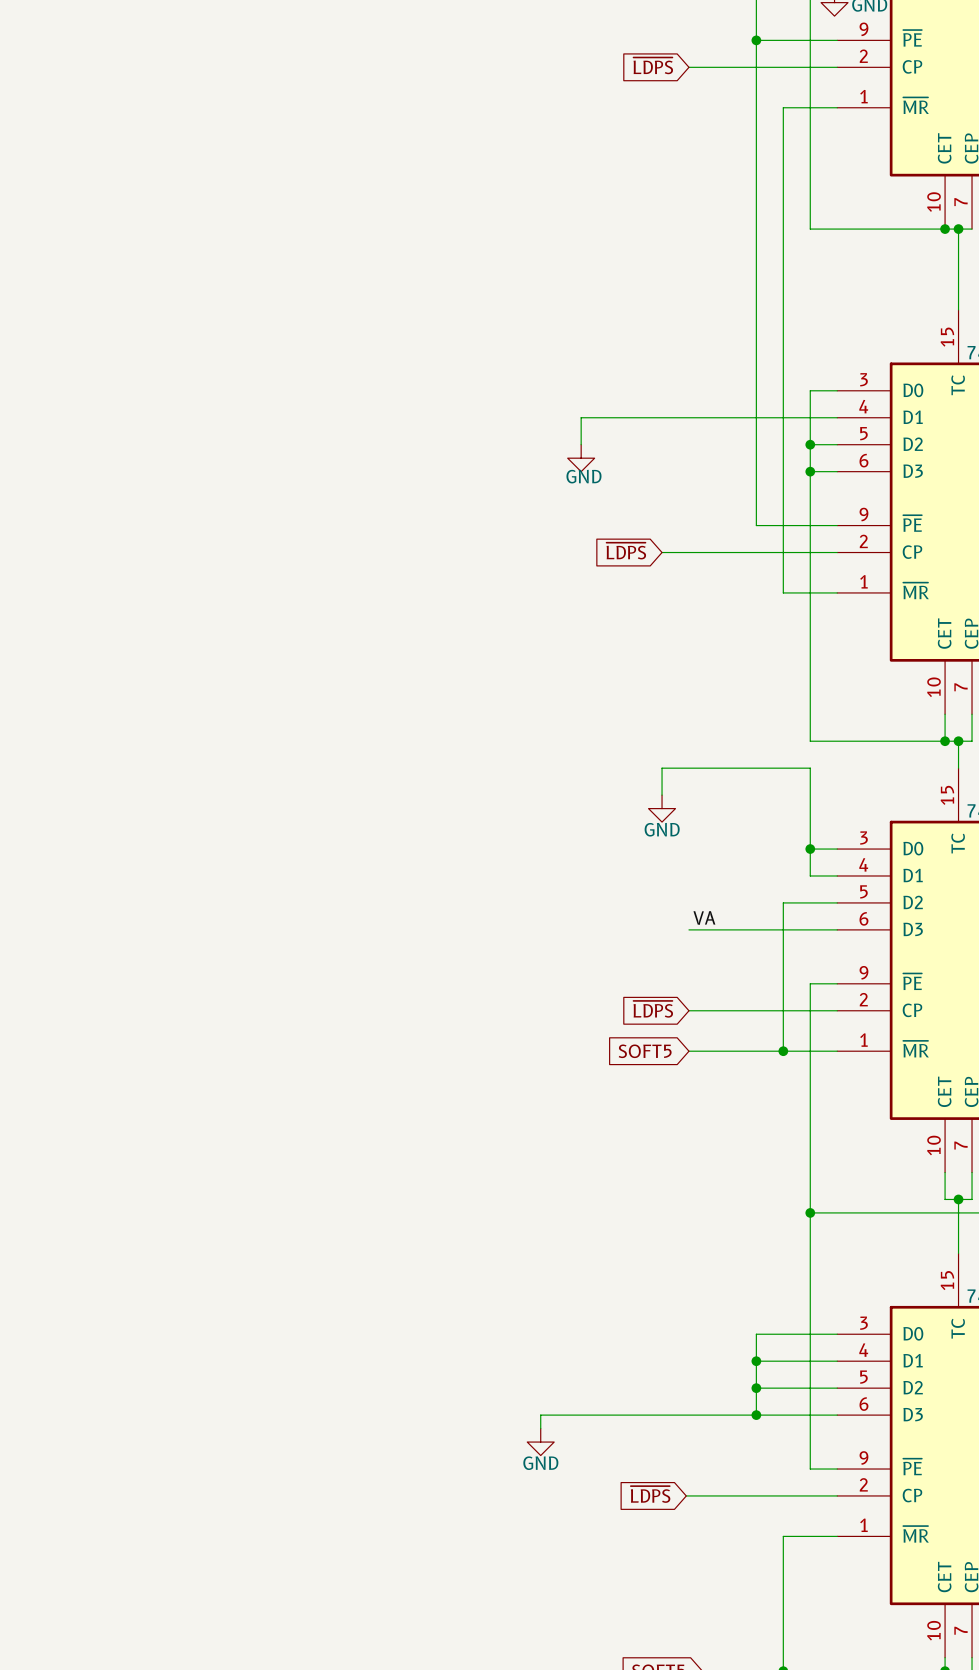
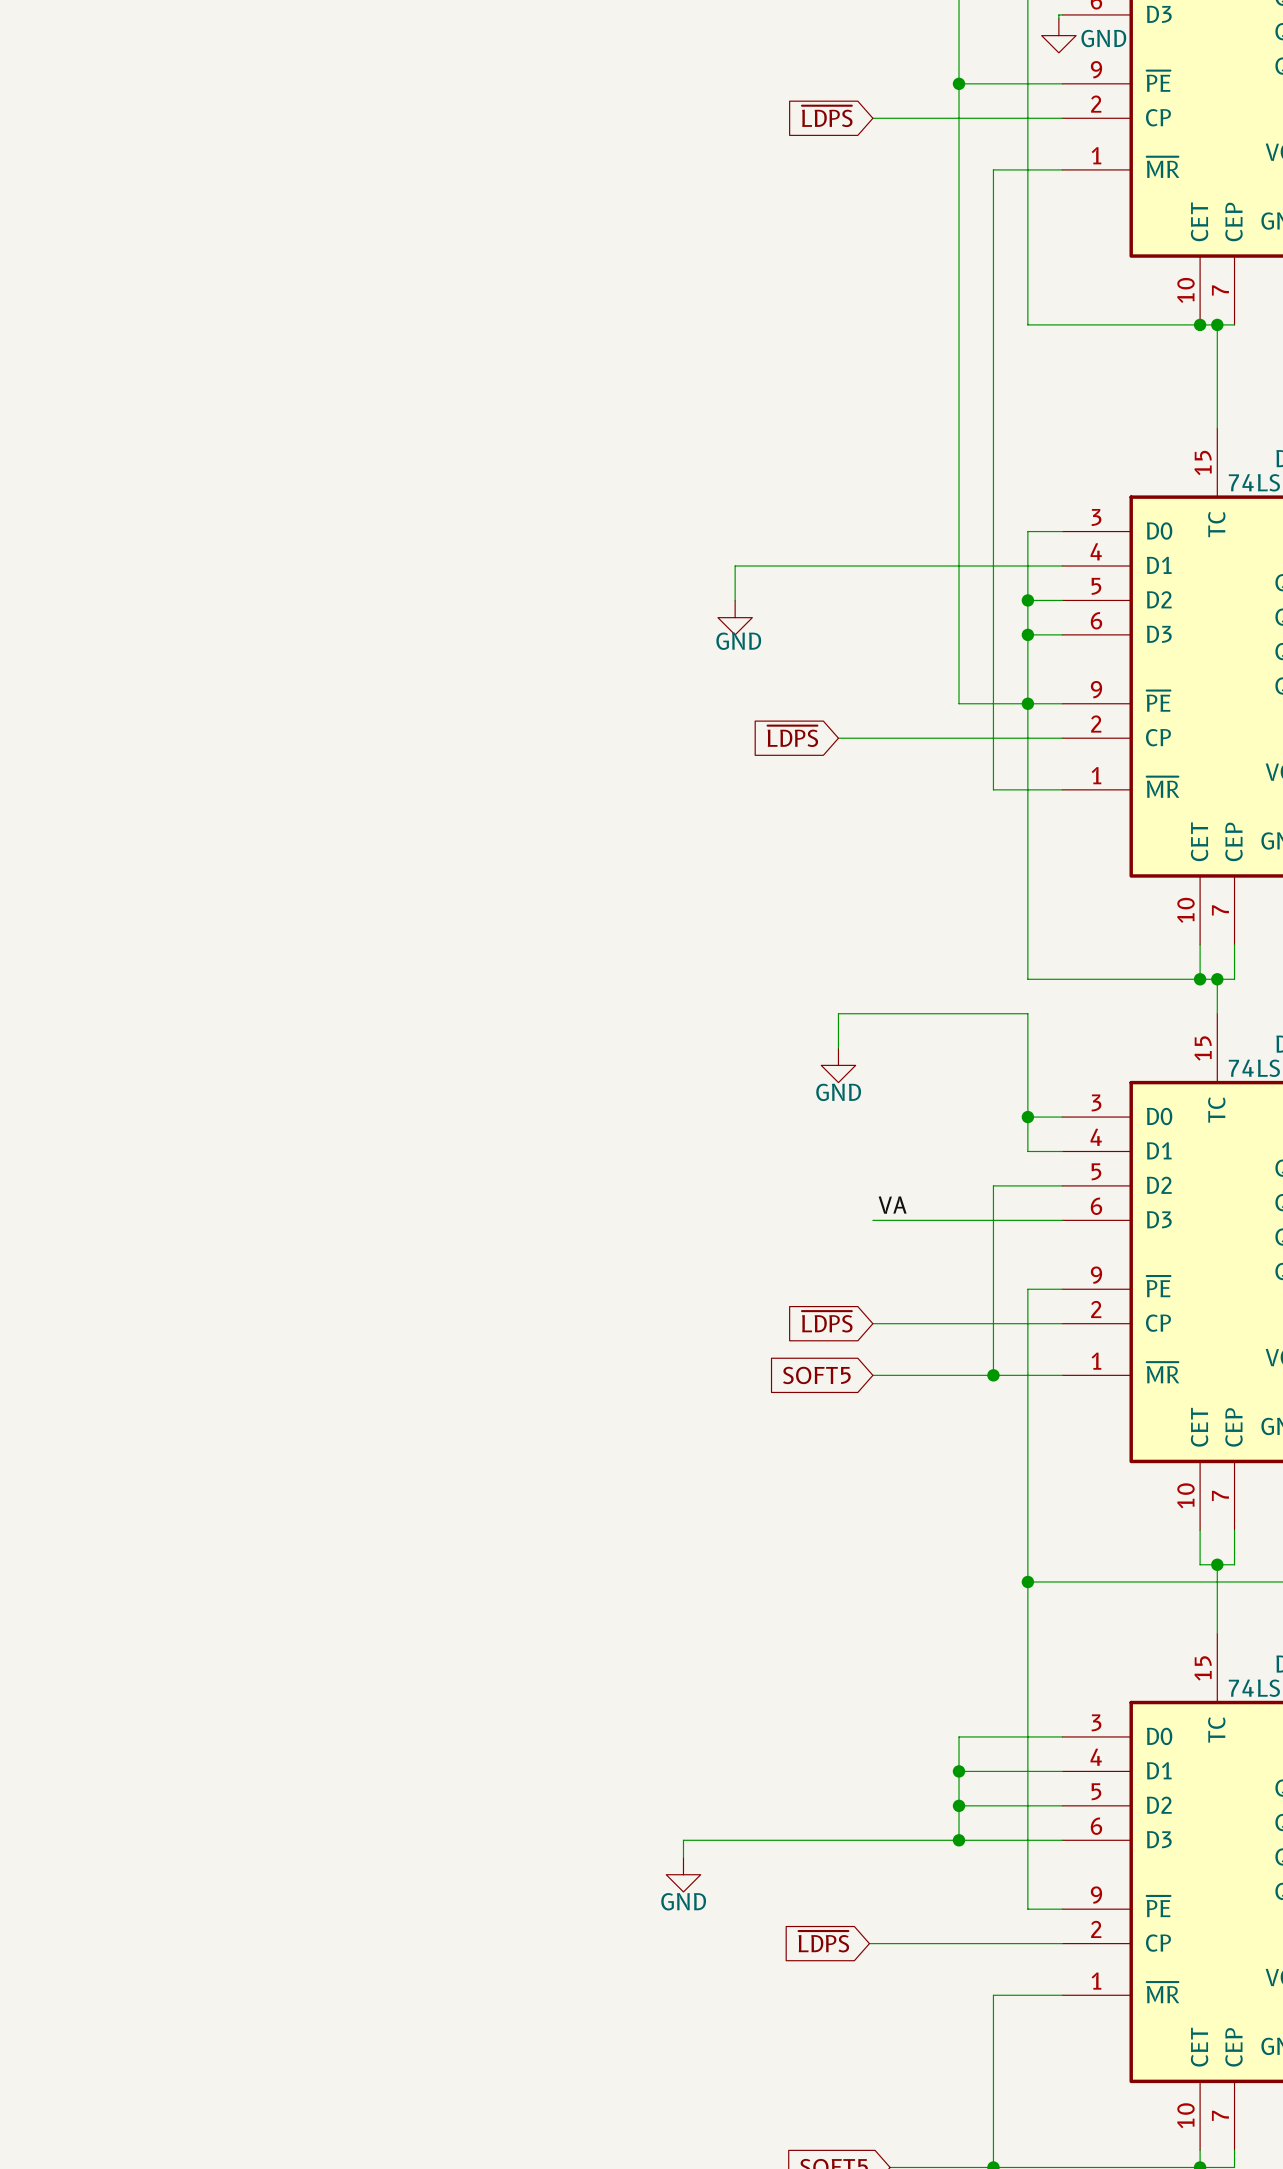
junction: none -> (1027, 703)

